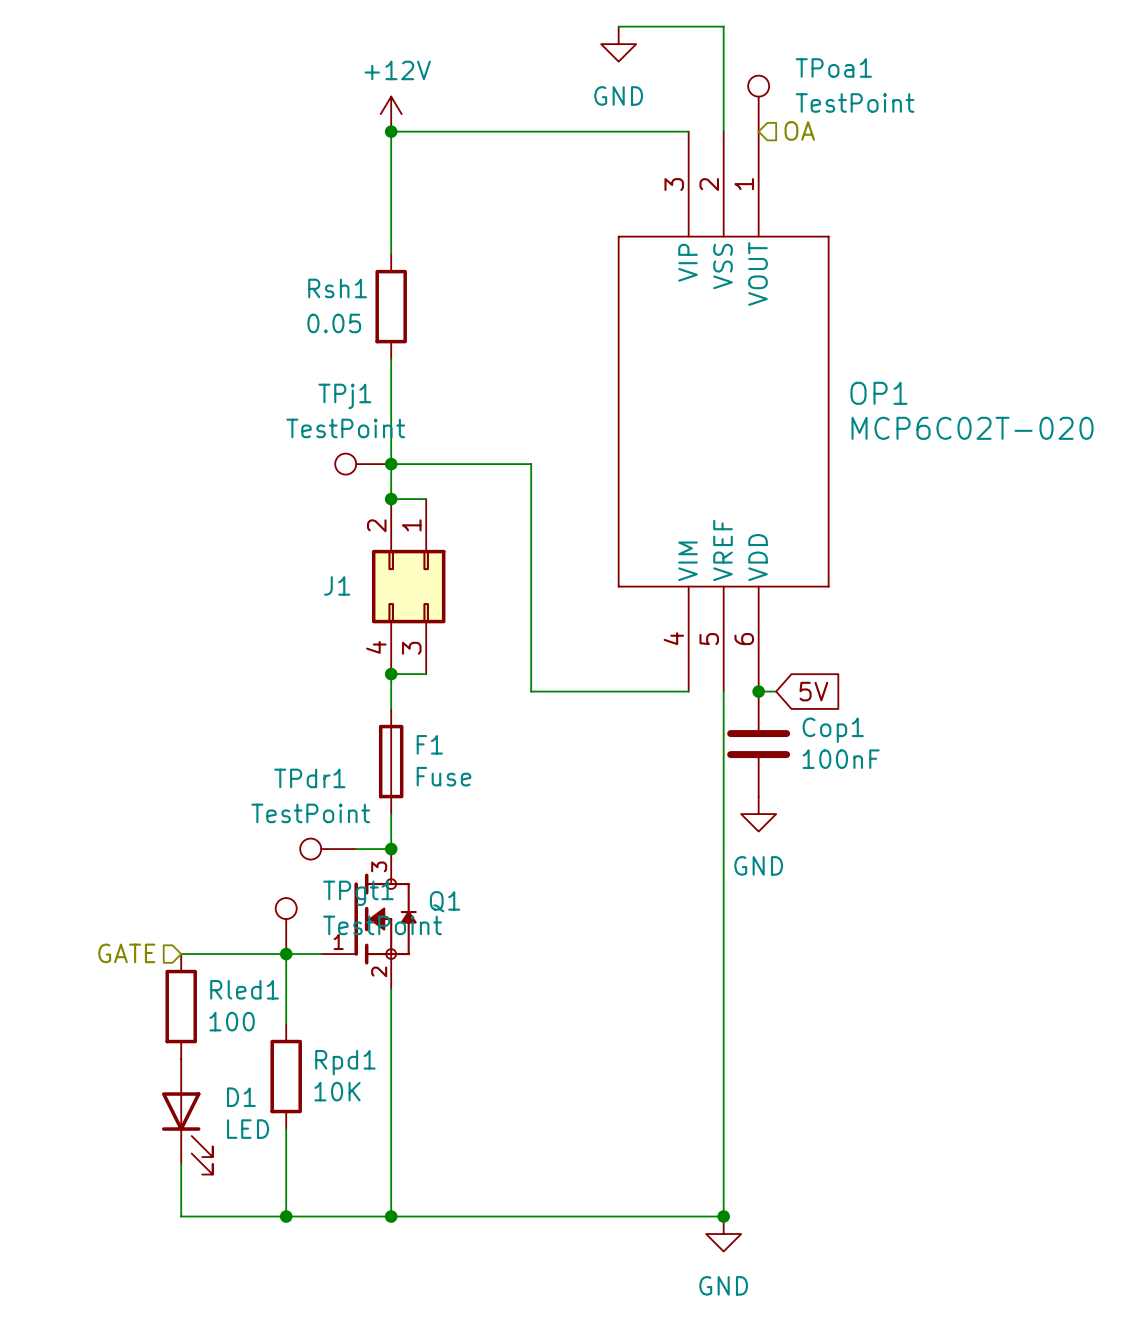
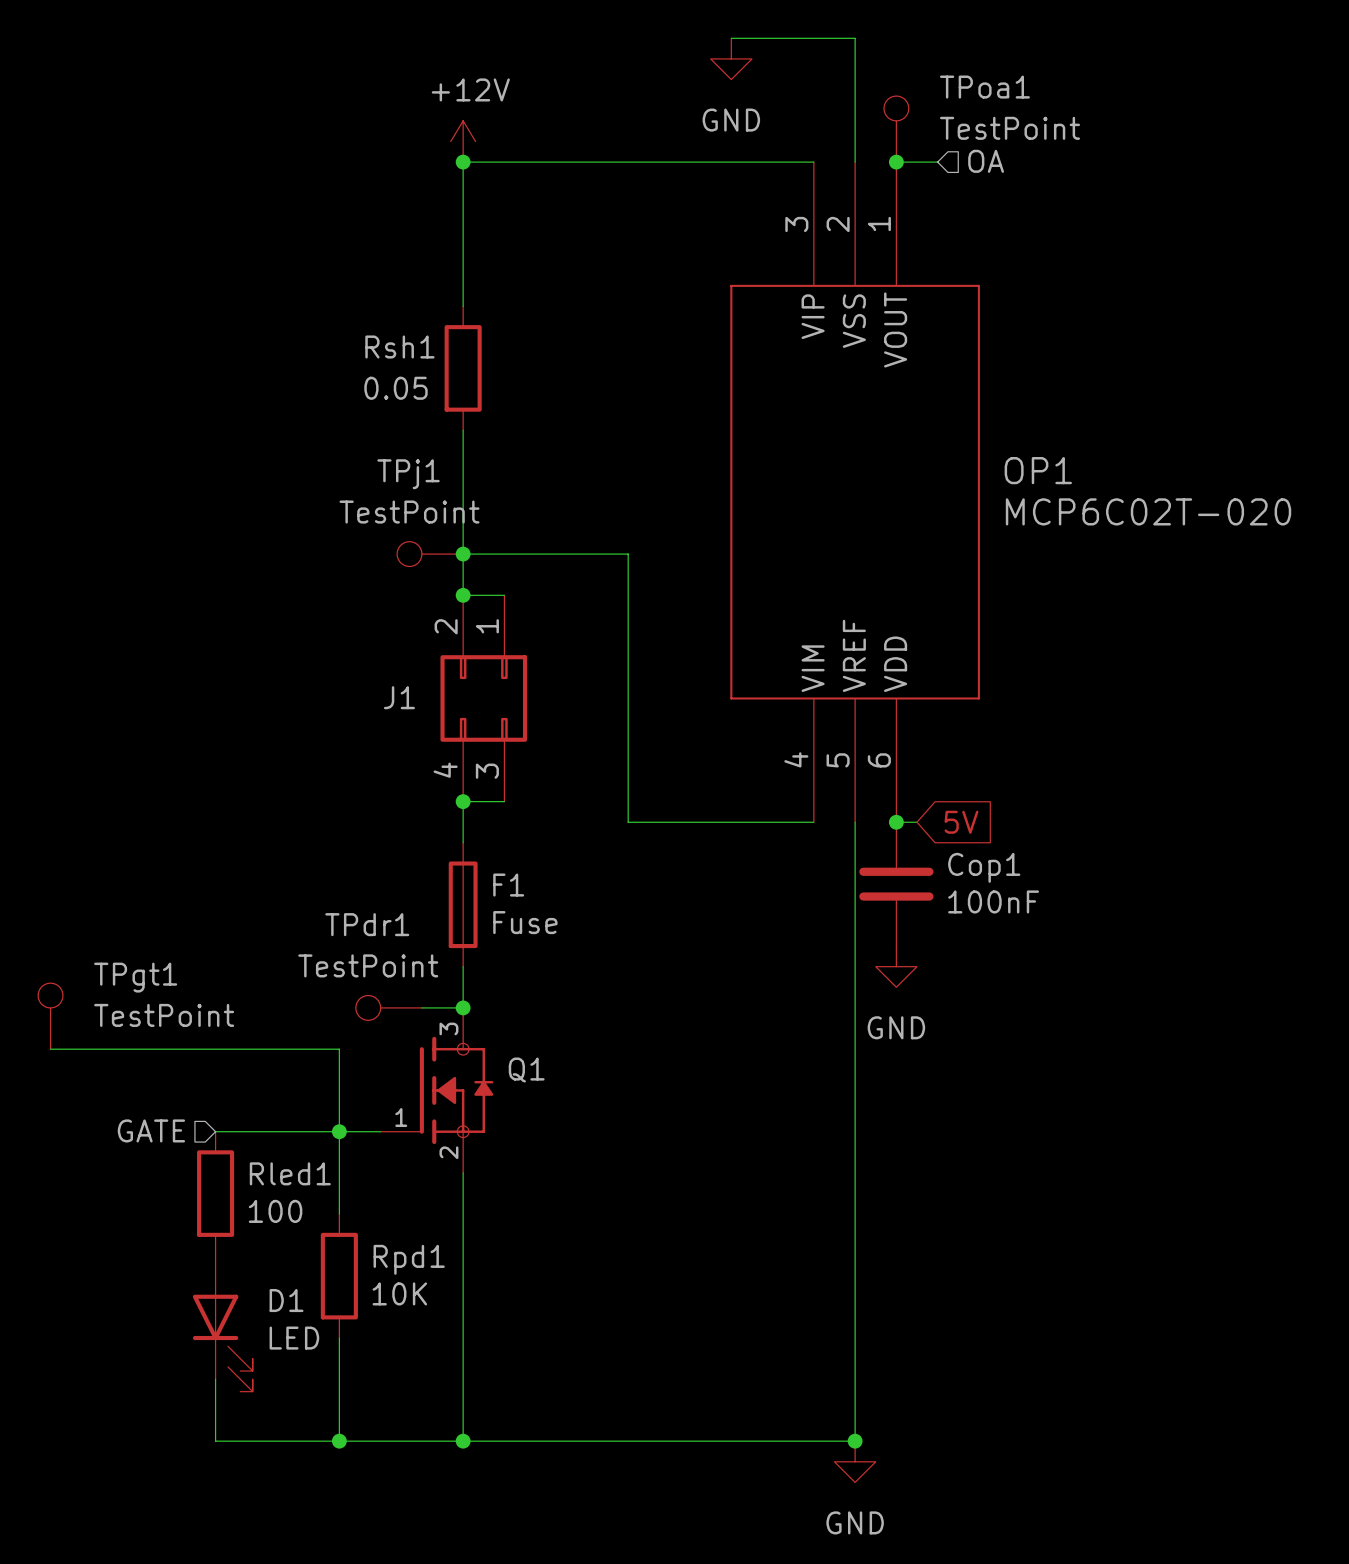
hierarchical label position: OA (799, 130) -> OA (986, 161)
wire: none -> (896, 162) (937, 162)
junction: none -> (896, 162)
wire: none -> (50, 1049) (339, 1049) (339, 1131)
TPgt1 position: (286, 926) -> (50, 1016)

